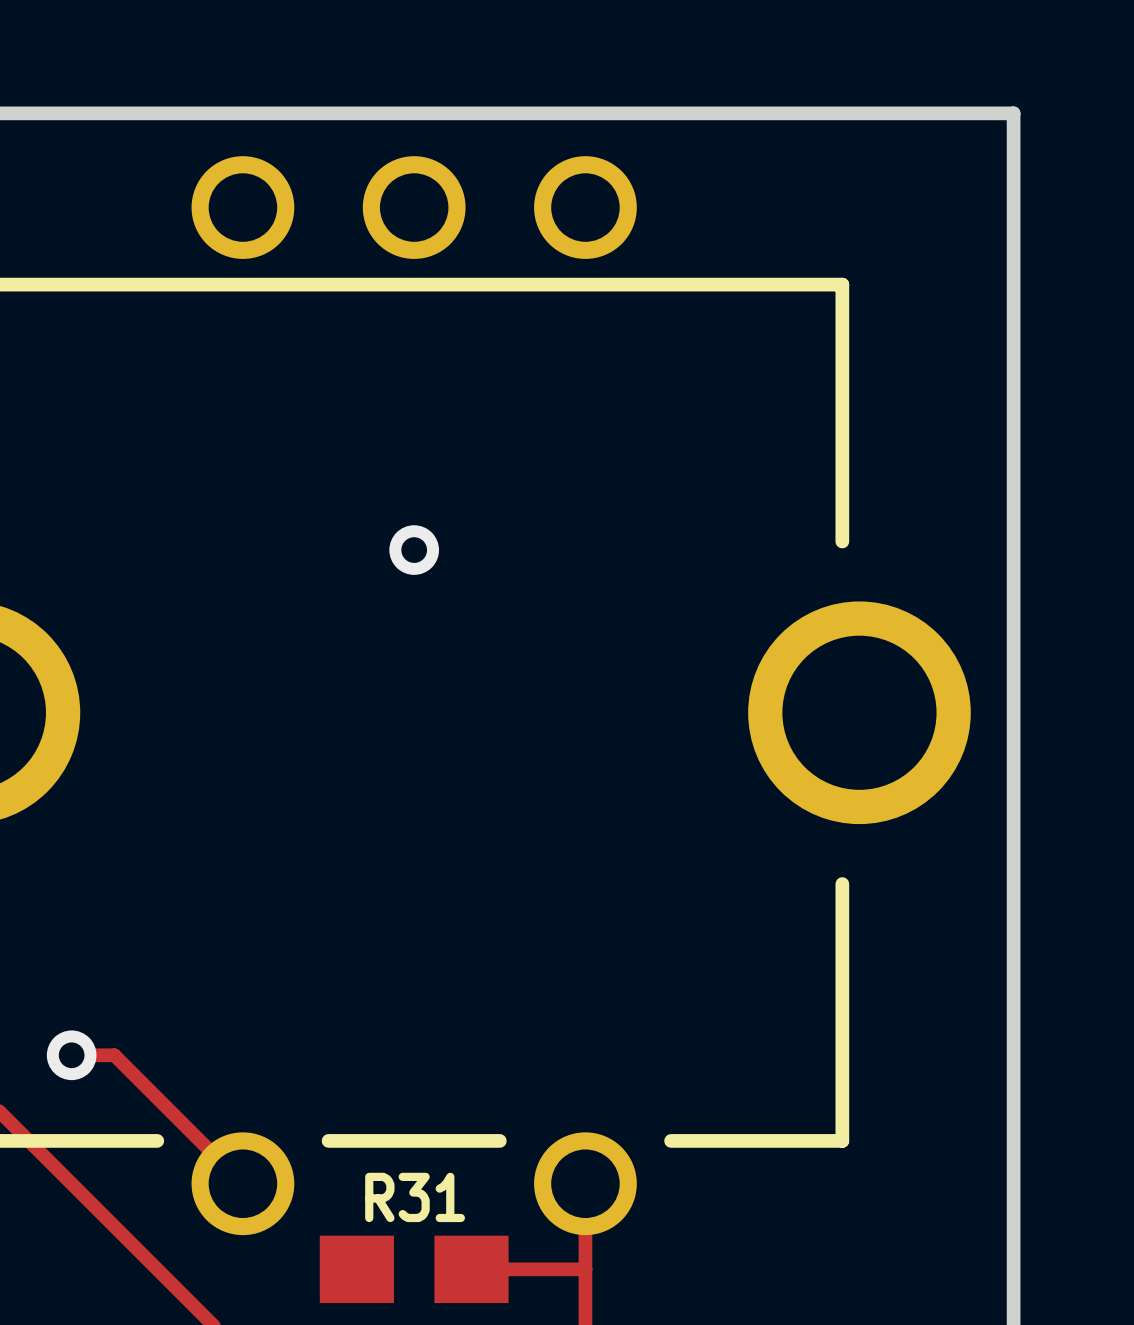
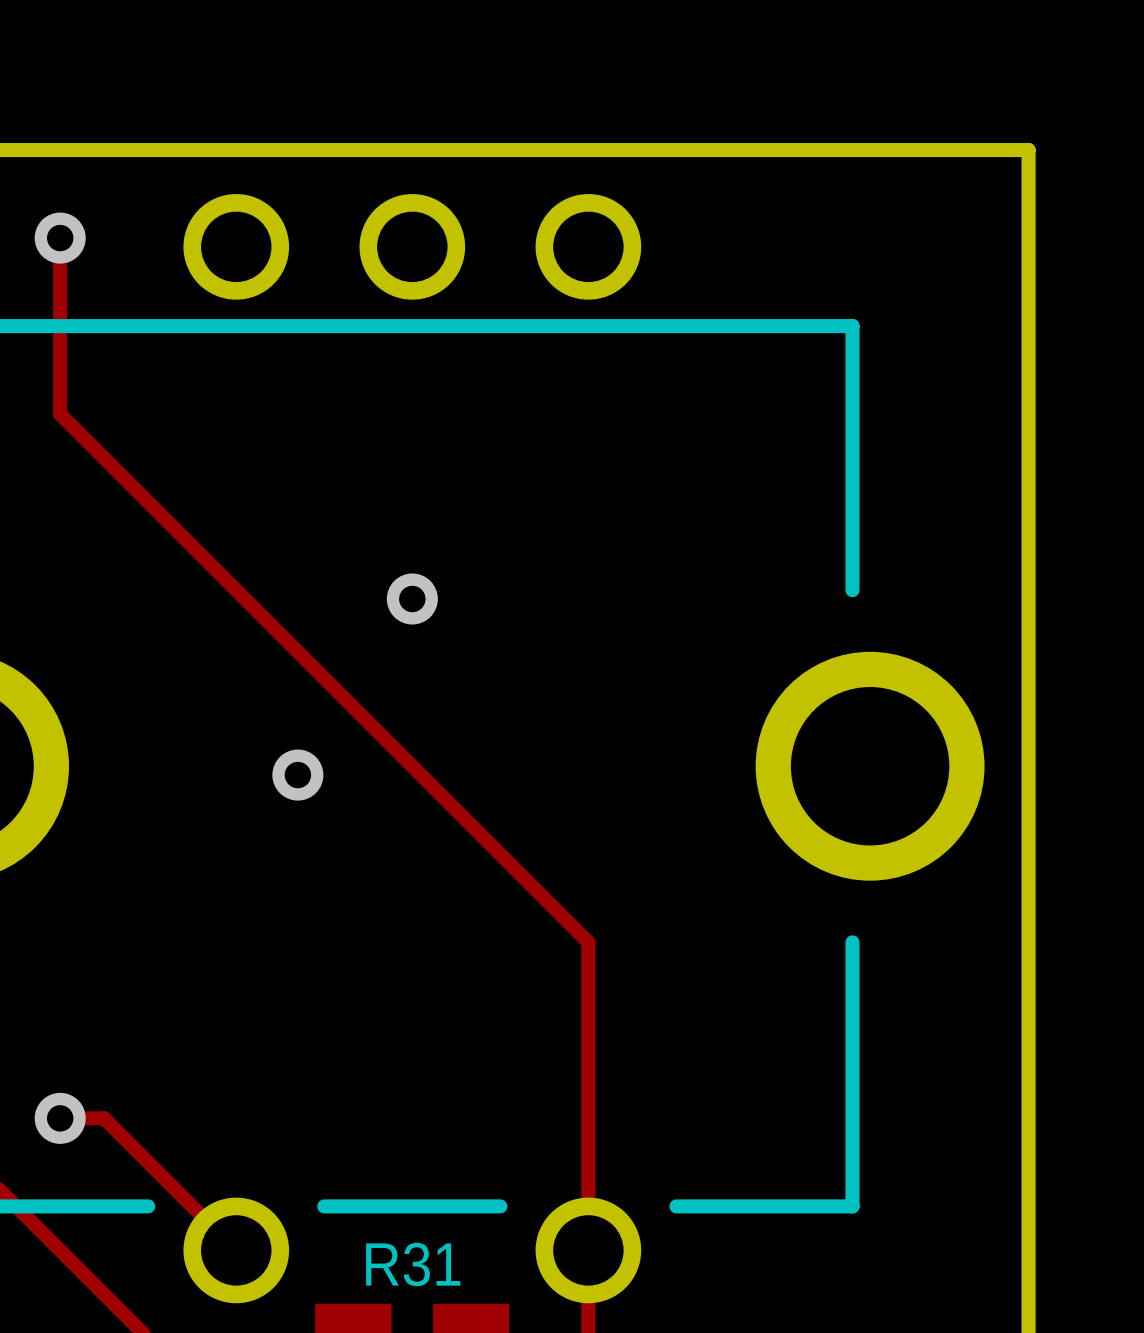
track: none -> (60, 238) (60, 414) (588, 942) (588, 1250)
via: none -> (60, 238)
via: none -> (297, 775)

